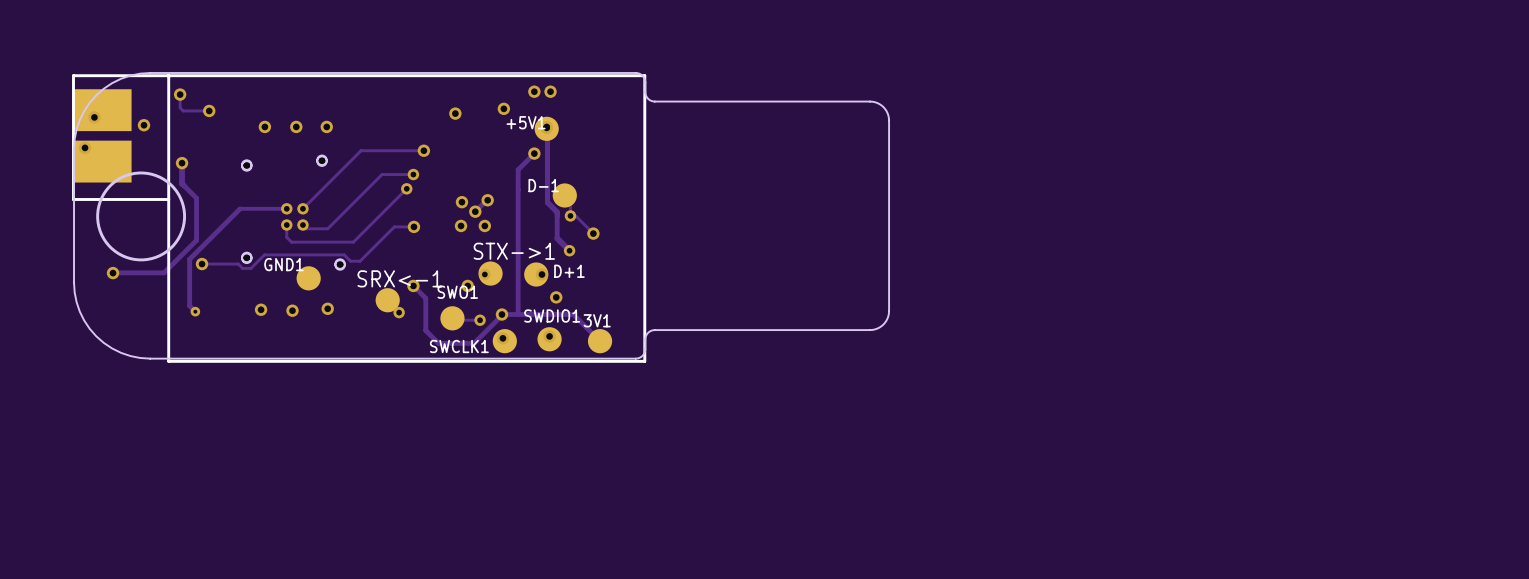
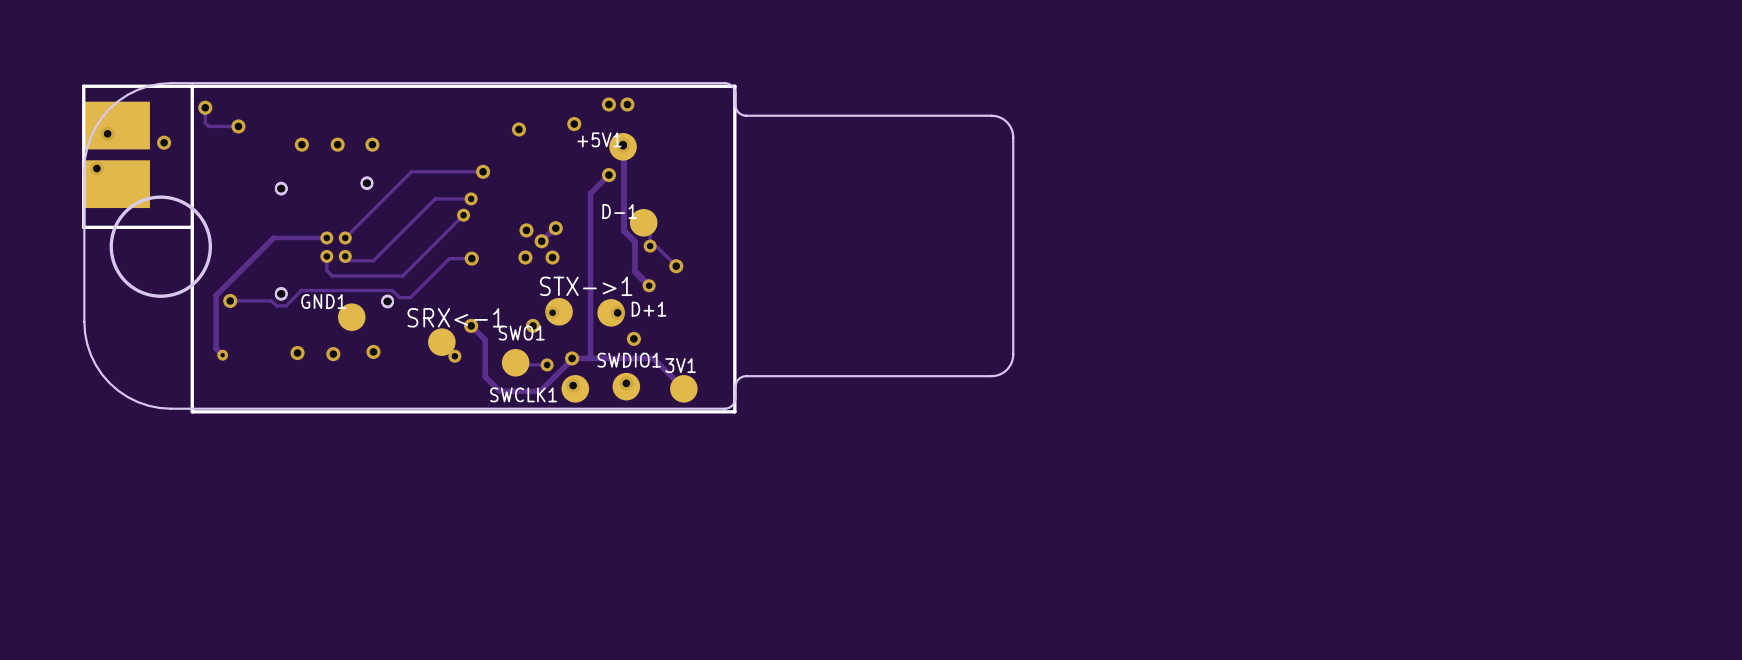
track: (182, 163) (182, 183) (196, 198) (196, 240) (164, 272) (113, 272) -> none
via: (182, 163) -> none
via: (113, 273) -> none

